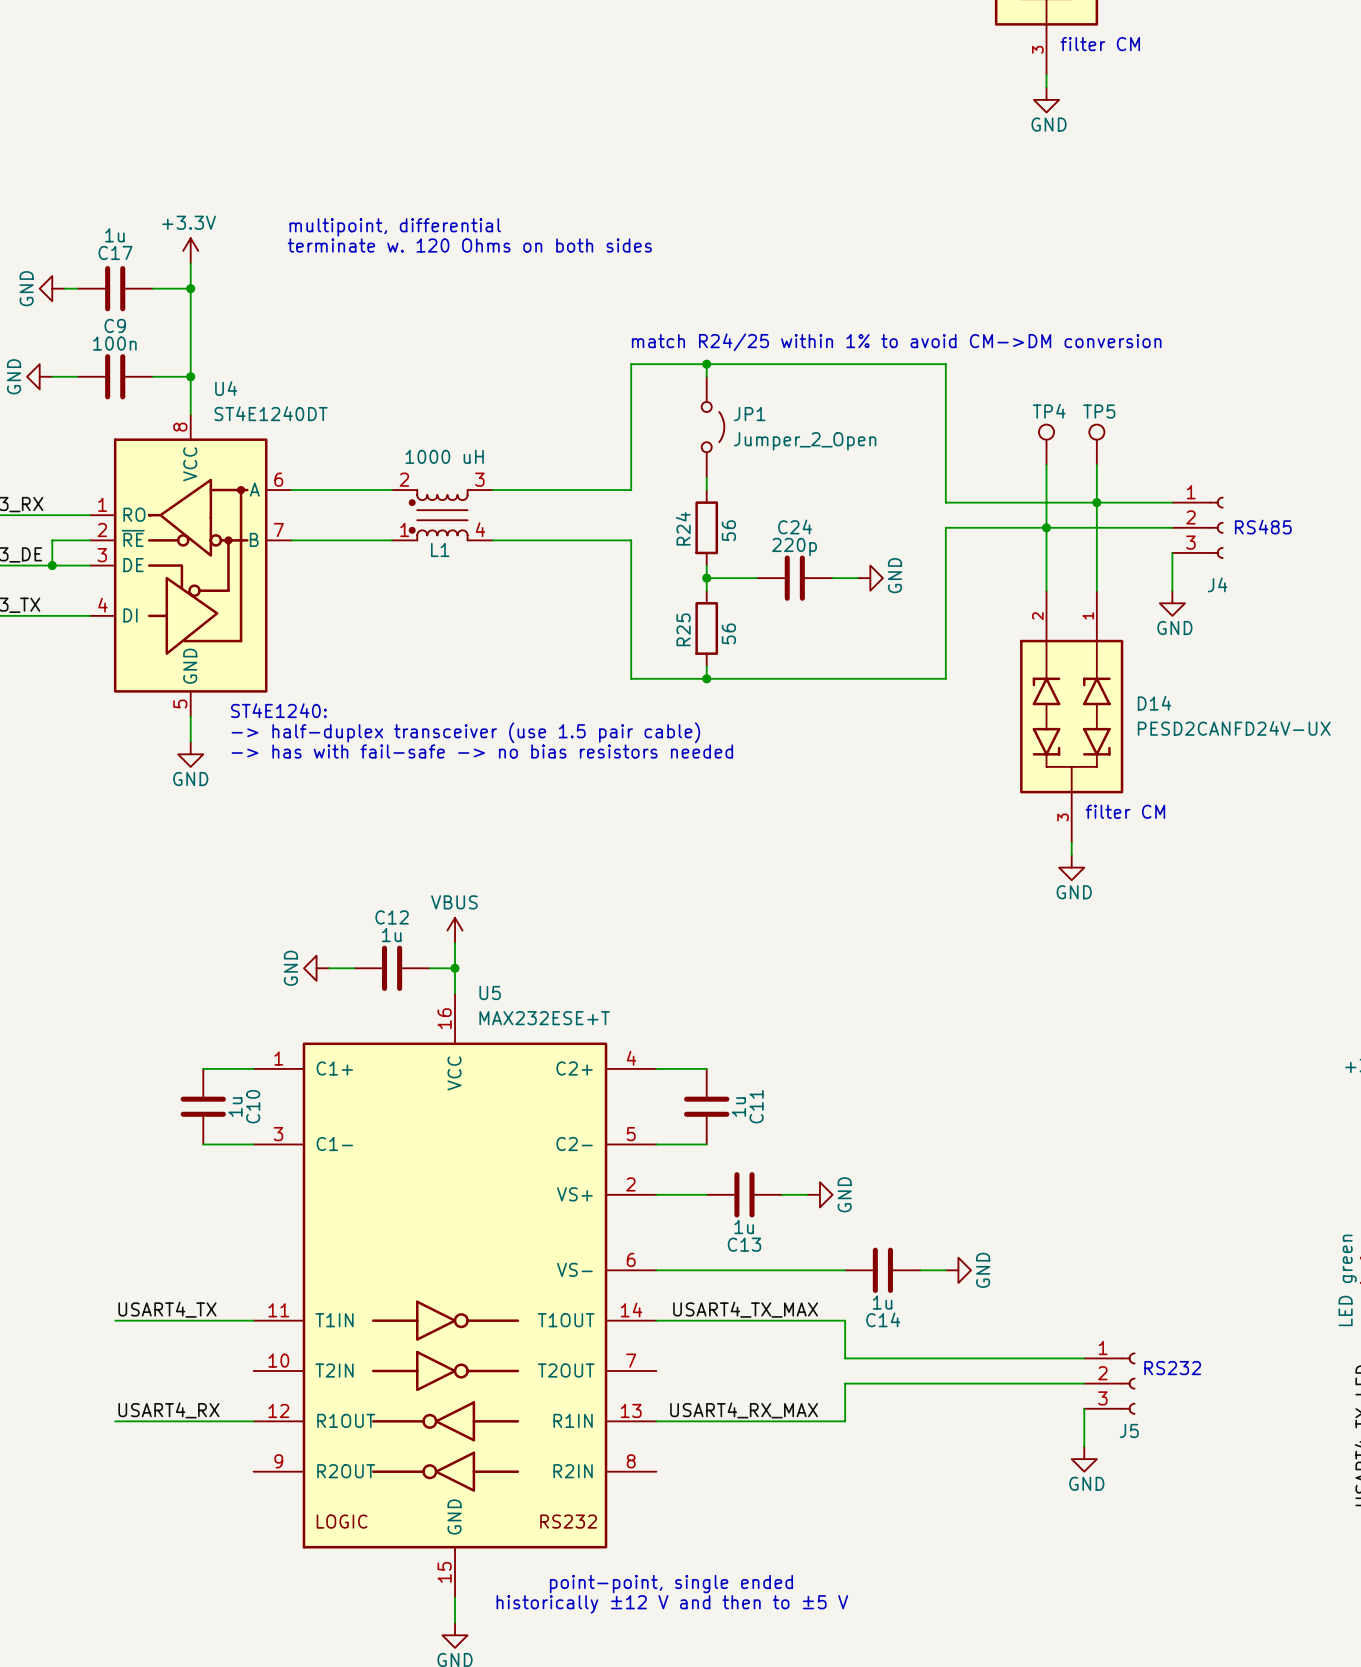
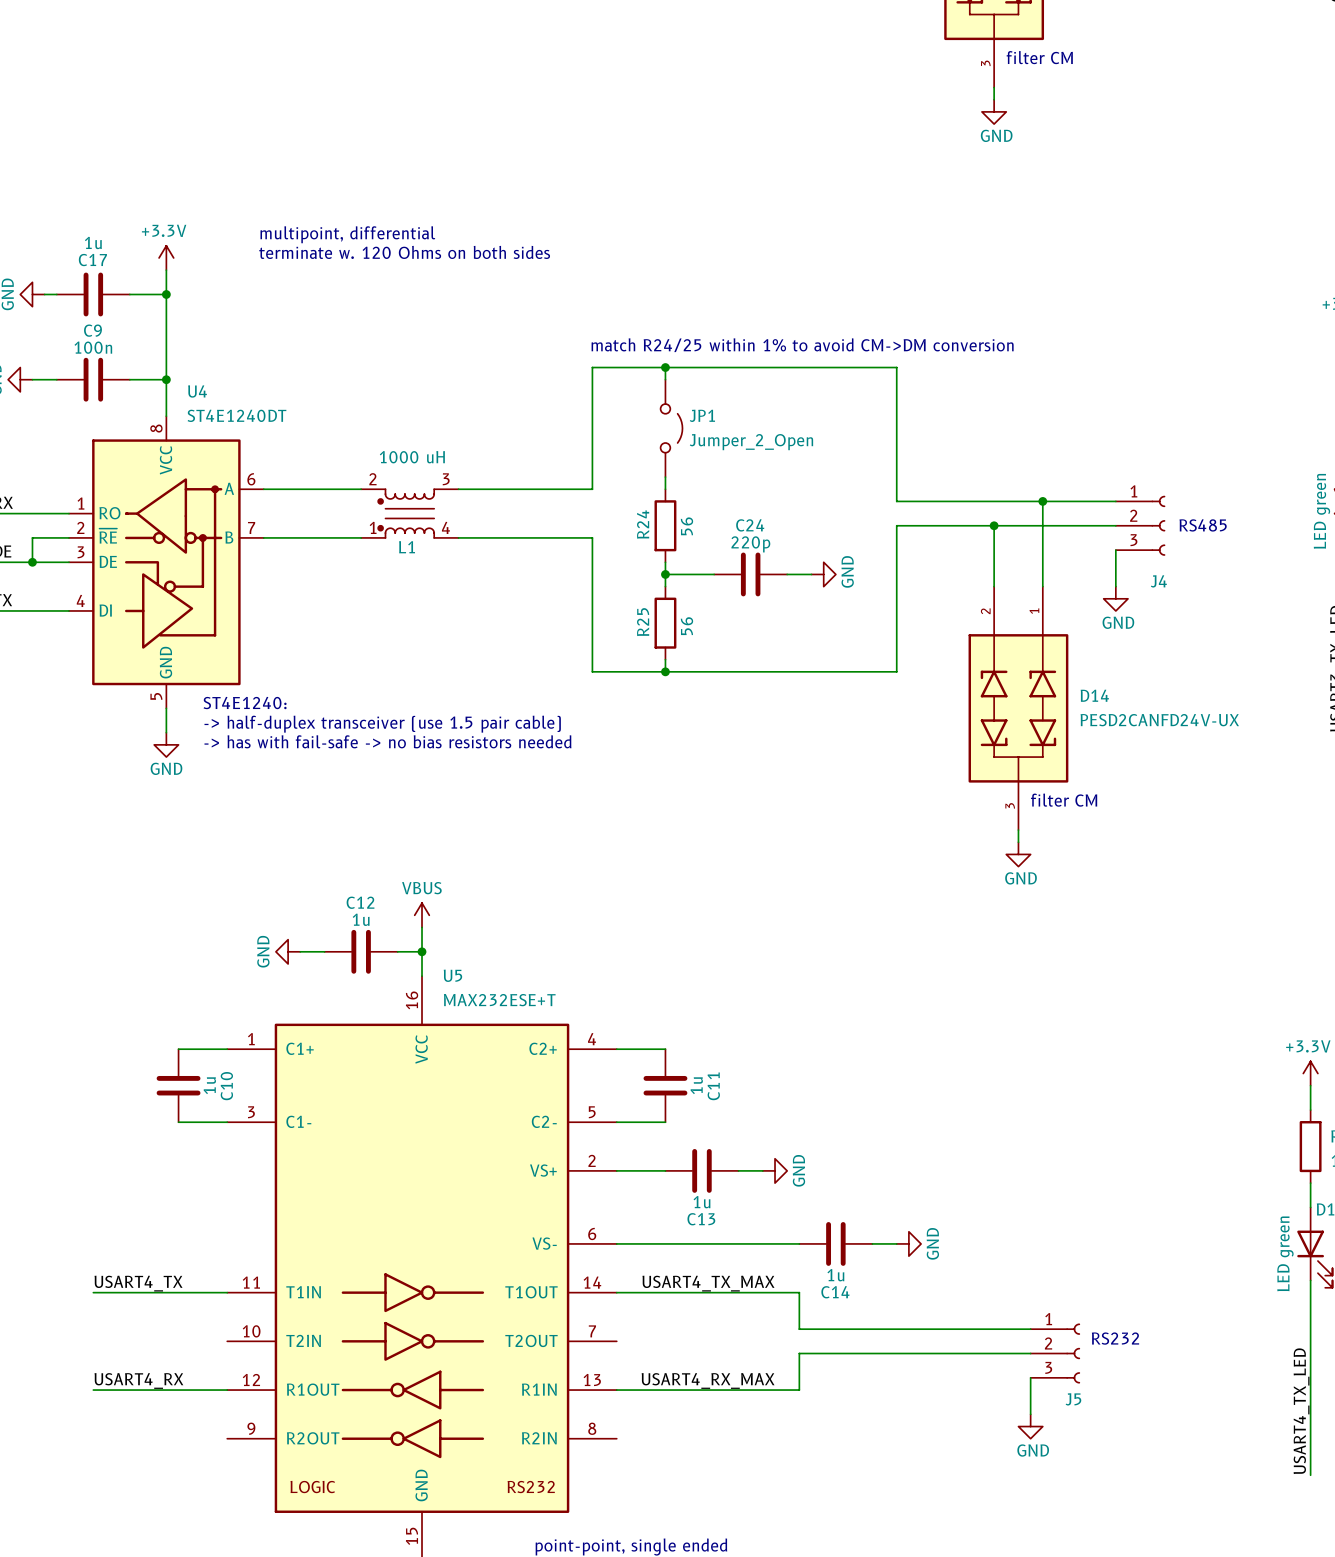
TP4: (1046, 444) -> none
TP5: (1096, 444) -> none
wire: (1046, 464) (1046, 527) -> none
wire: (1096, 464) (1096, 502) -> none

